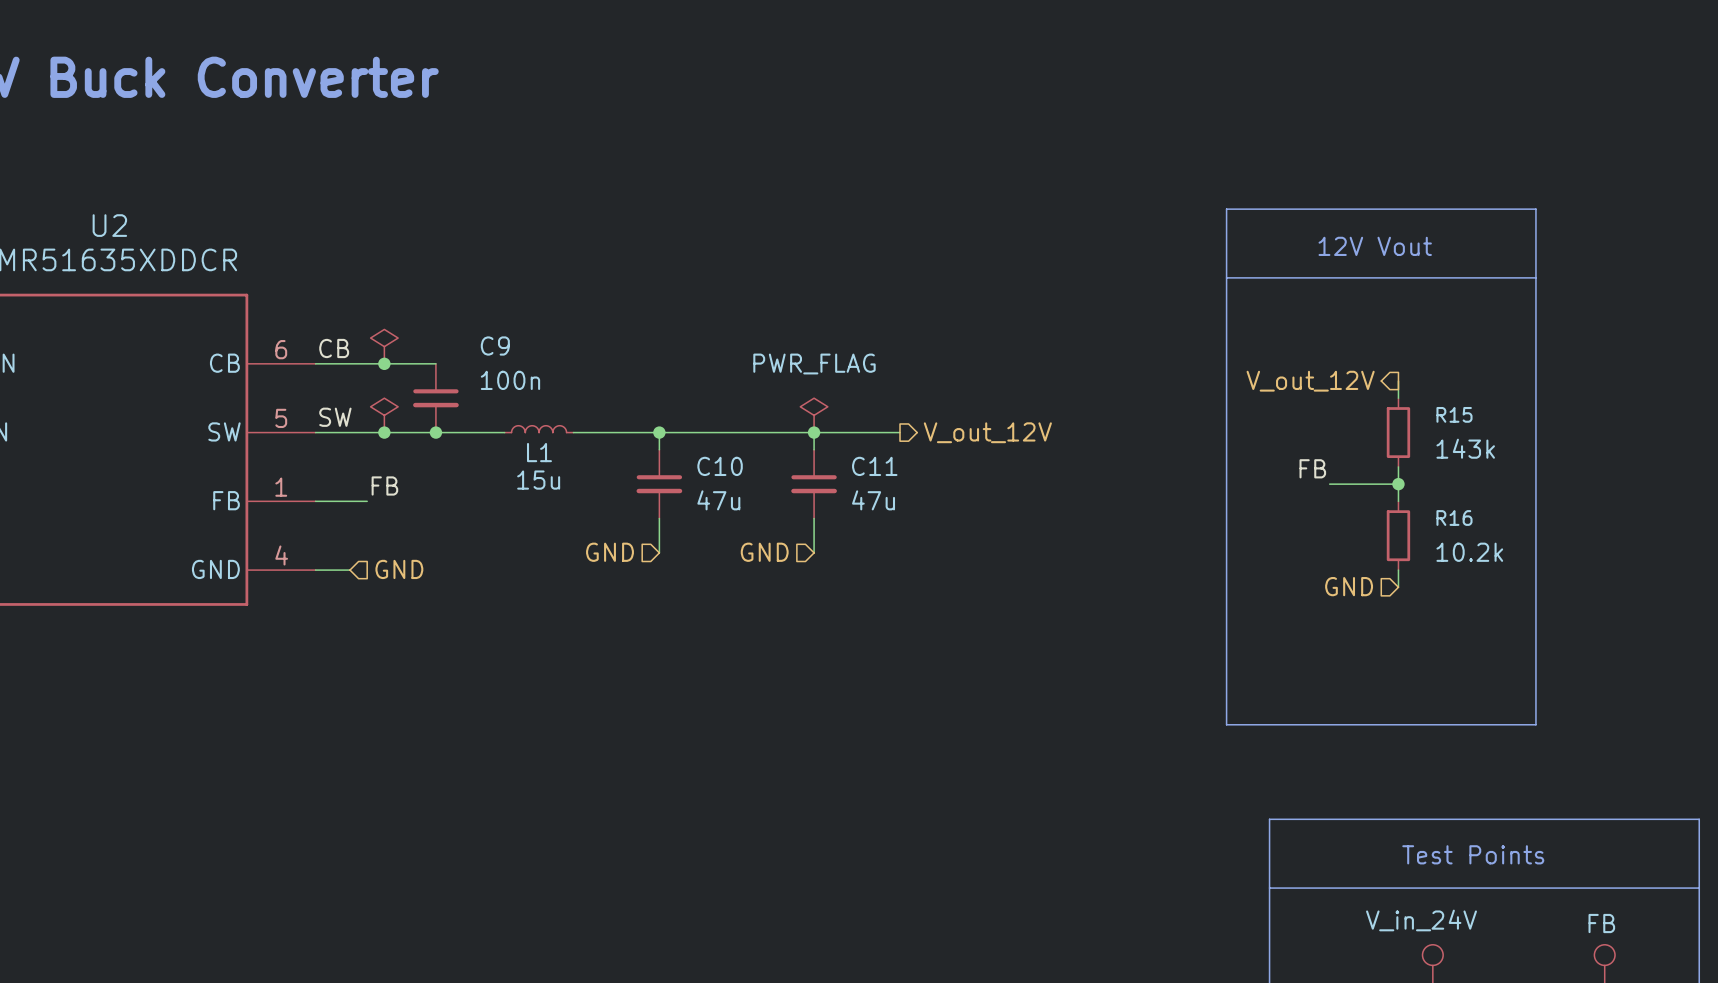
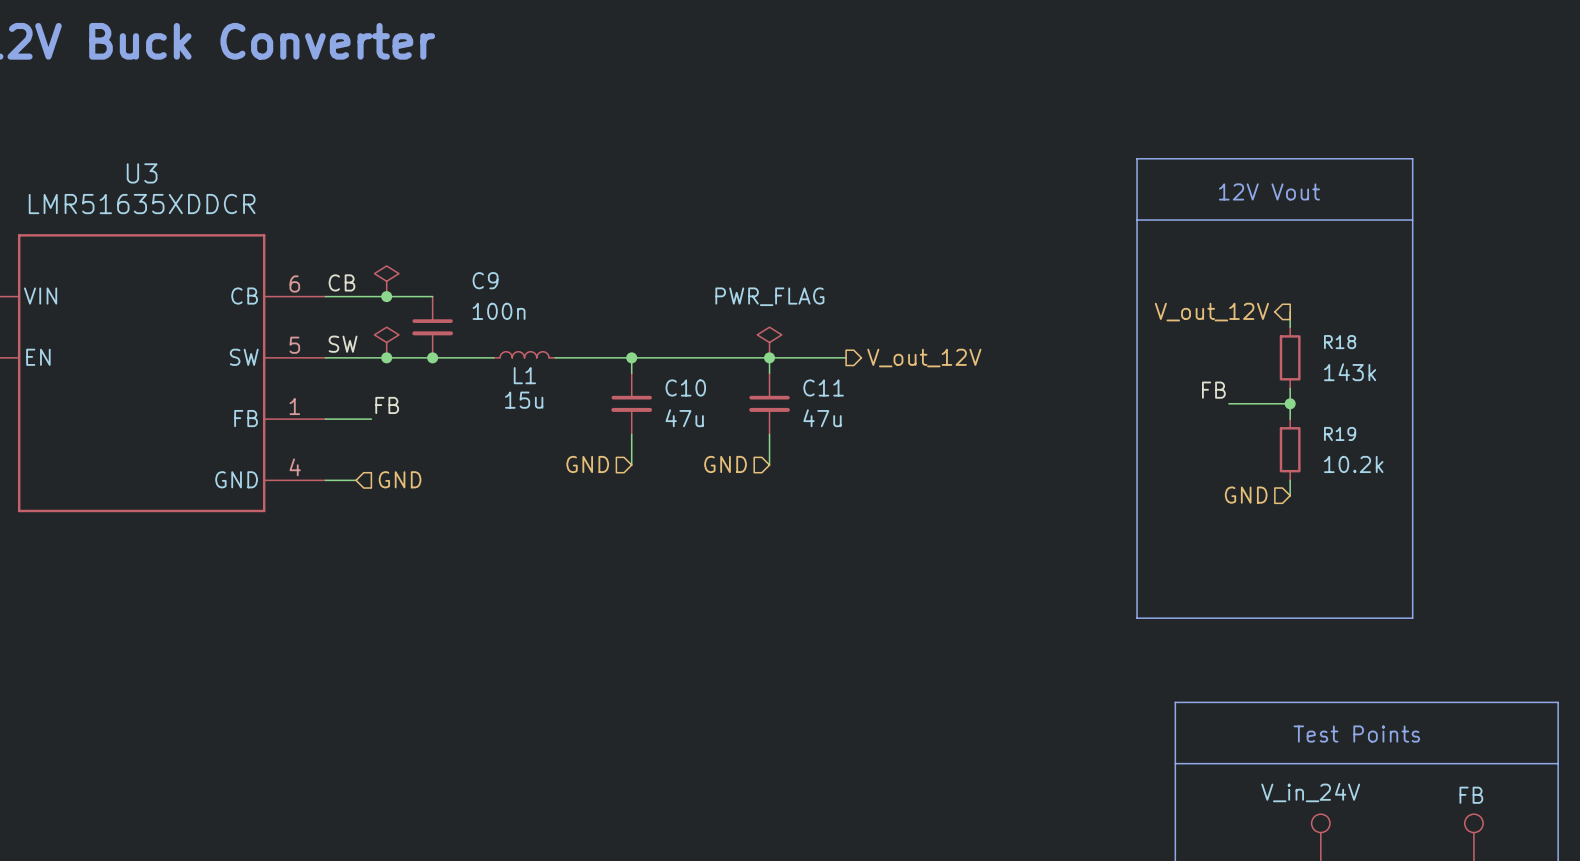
U2 name: U2 (109, 225) -> U3 (142, 173)
R15 name: R15 (1454, 414) -> R18 (1340, 342)
R16 name: R16 (1454, 518) -> R19 (1340, 433)

